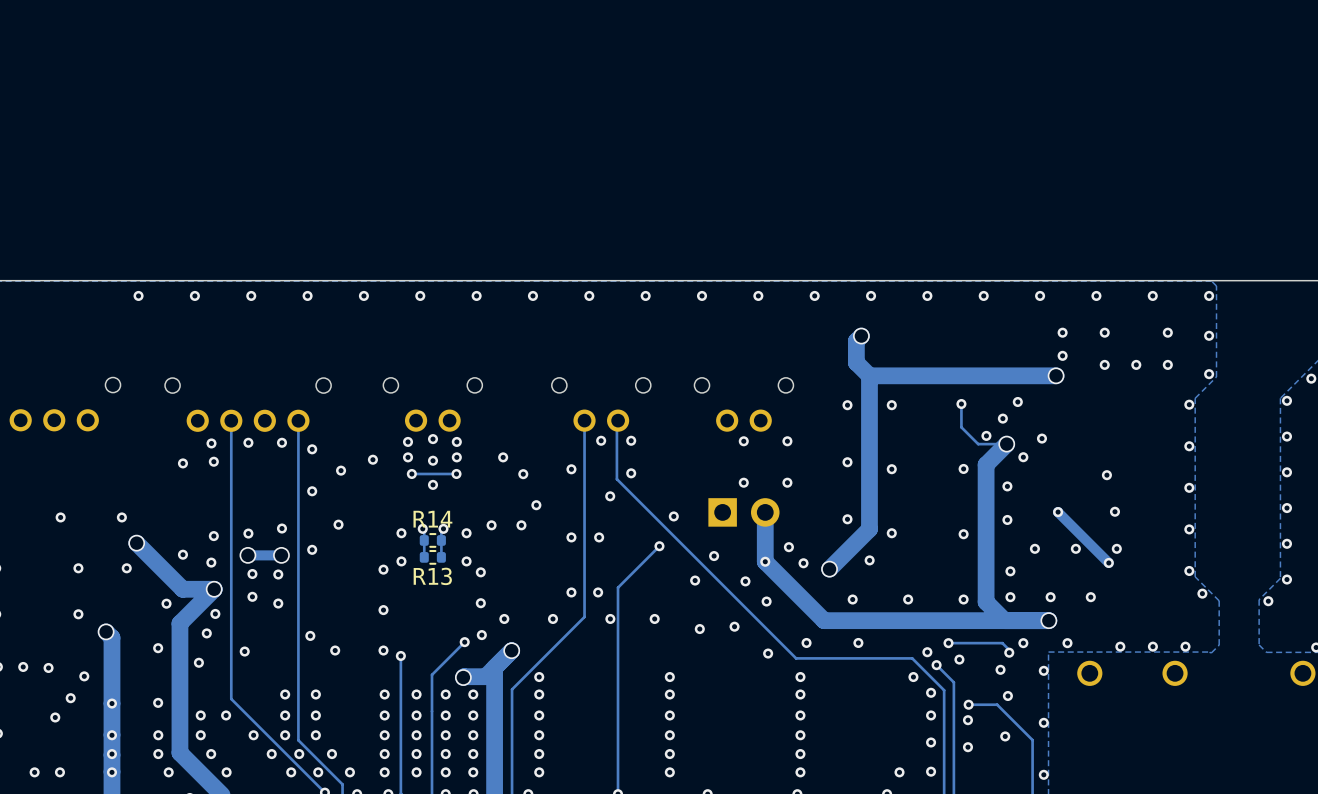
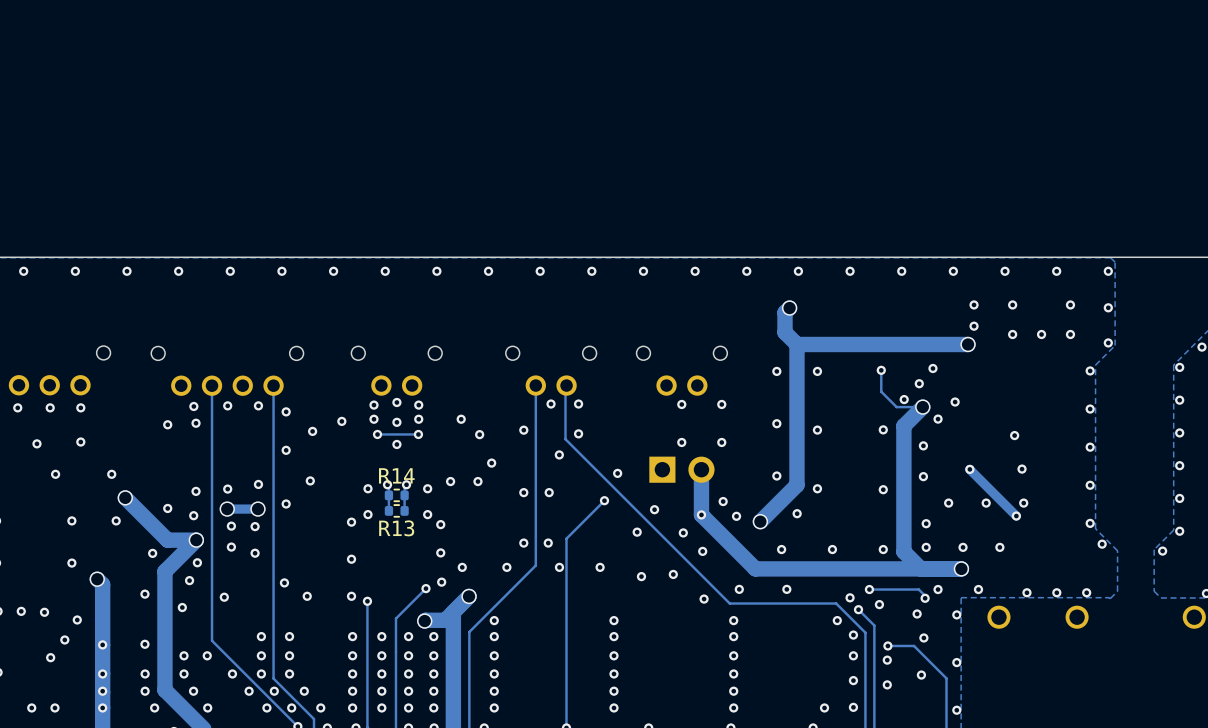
via: none -> (23, 271)
via: none -> (75, 271)
via: none -> (17, 407)
via: none -> (50, 407)
via: none -> (80, 407)
via: none -> (80, 442)
via: none -> (36, 443)

